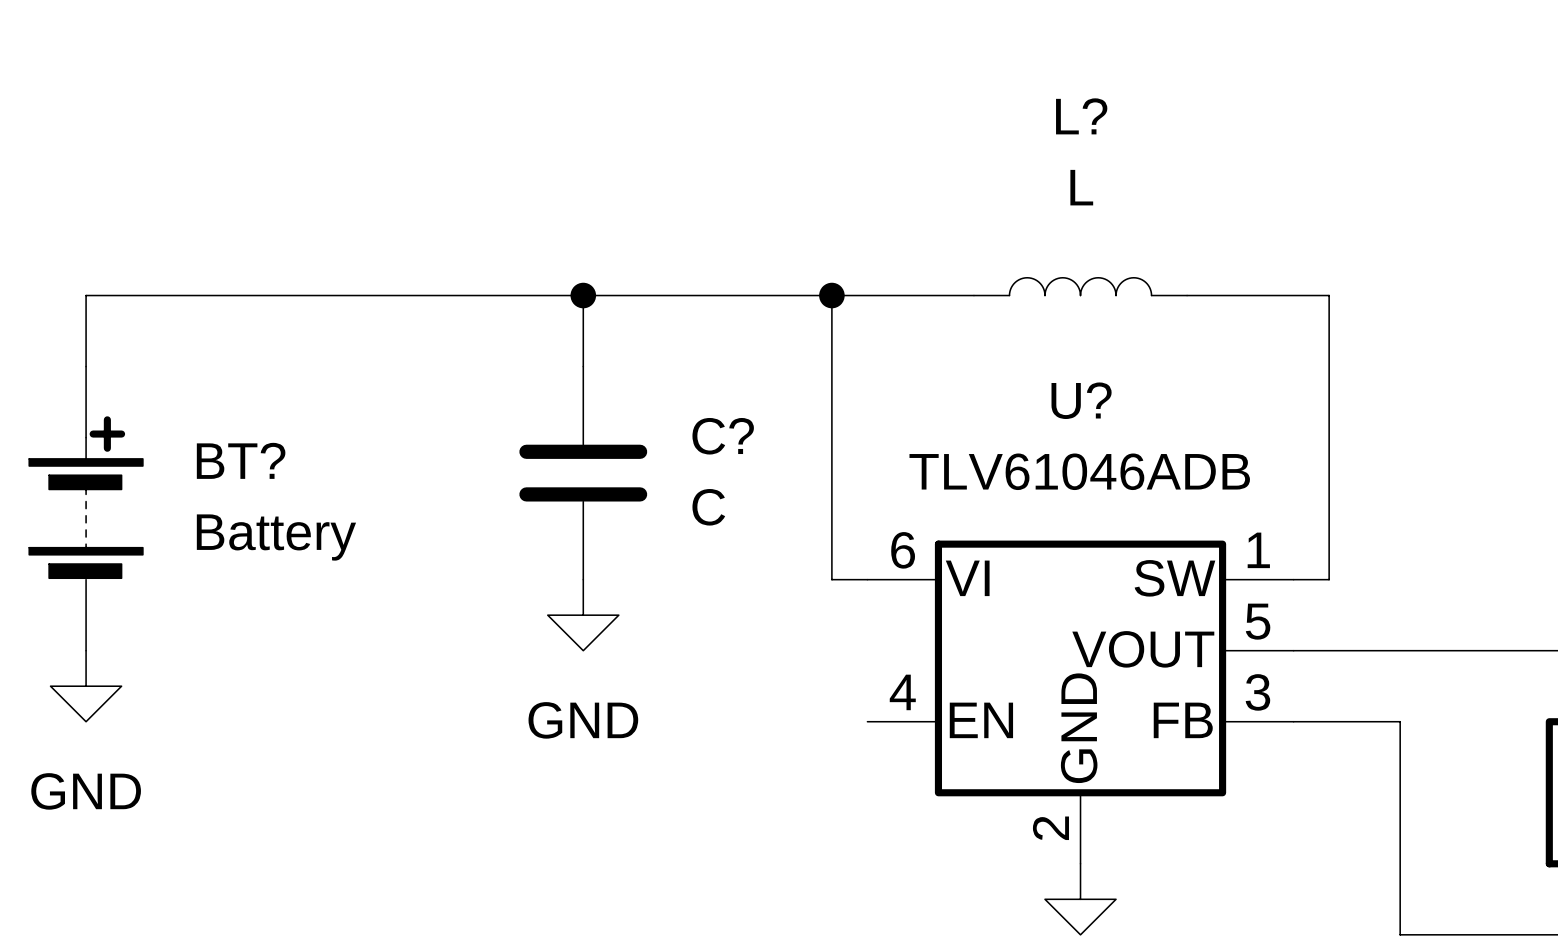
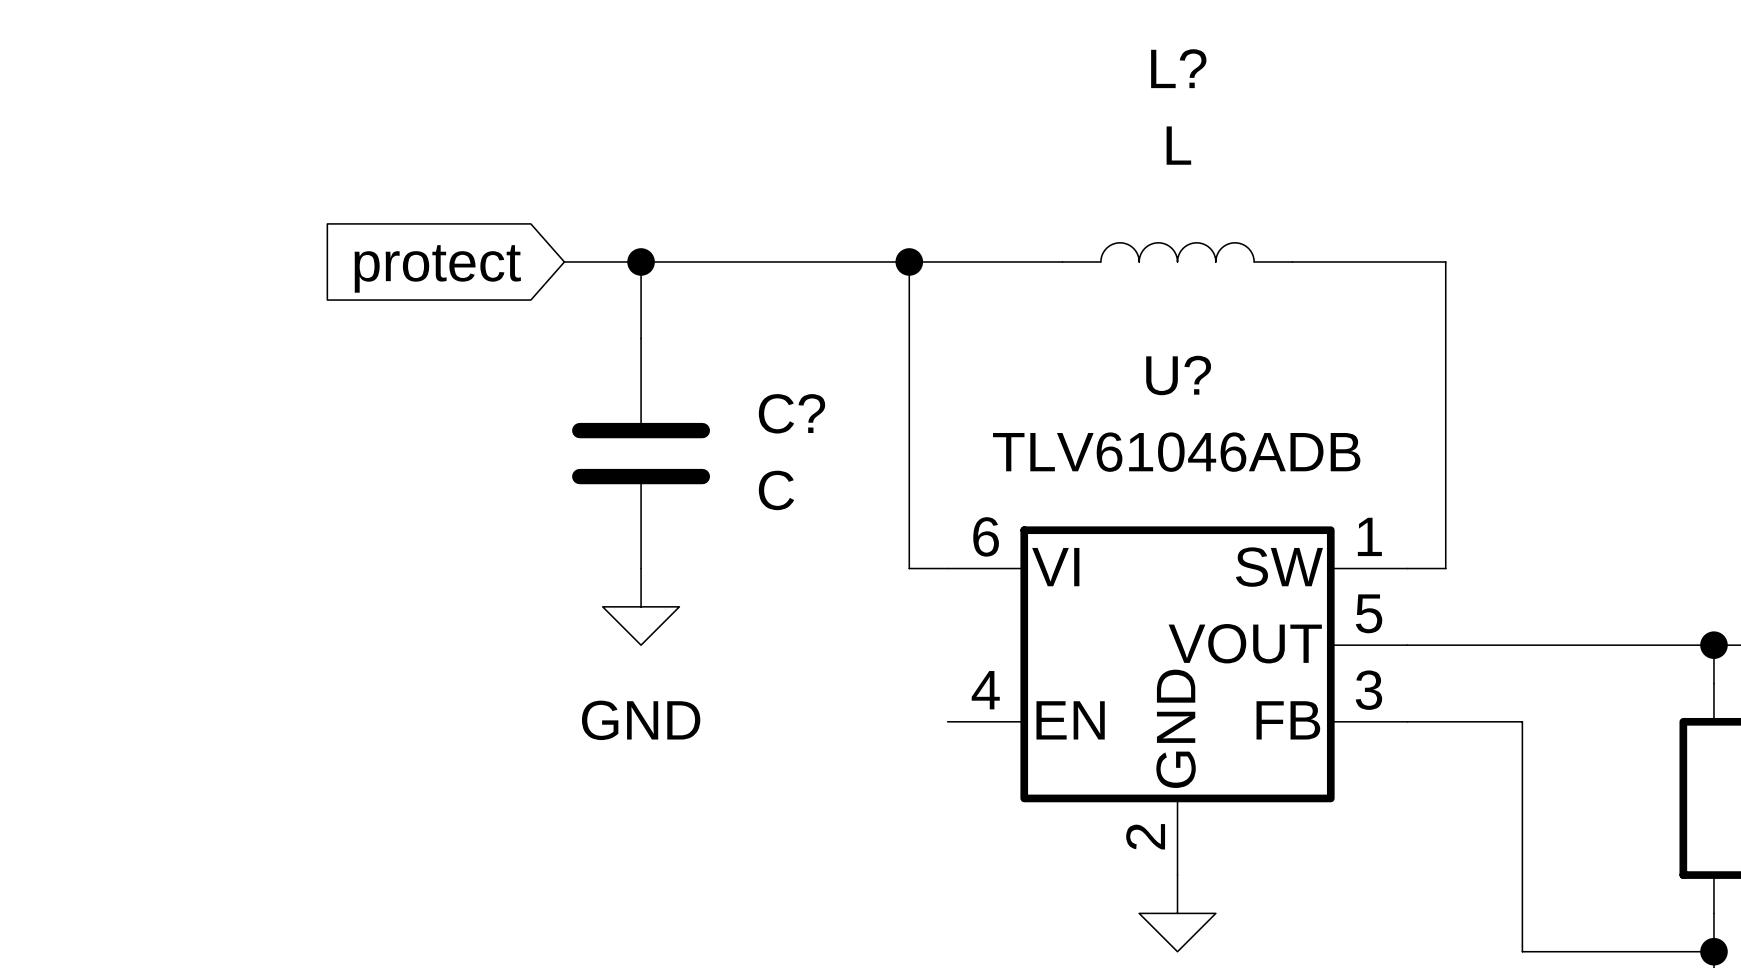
wire: (512, 295) (86, 295) (86, 366) -> none
global label: none -> protect (437, 268)
BT?: Battery (86, 508) -> none
power symbol: GND (86, 686) -> none

